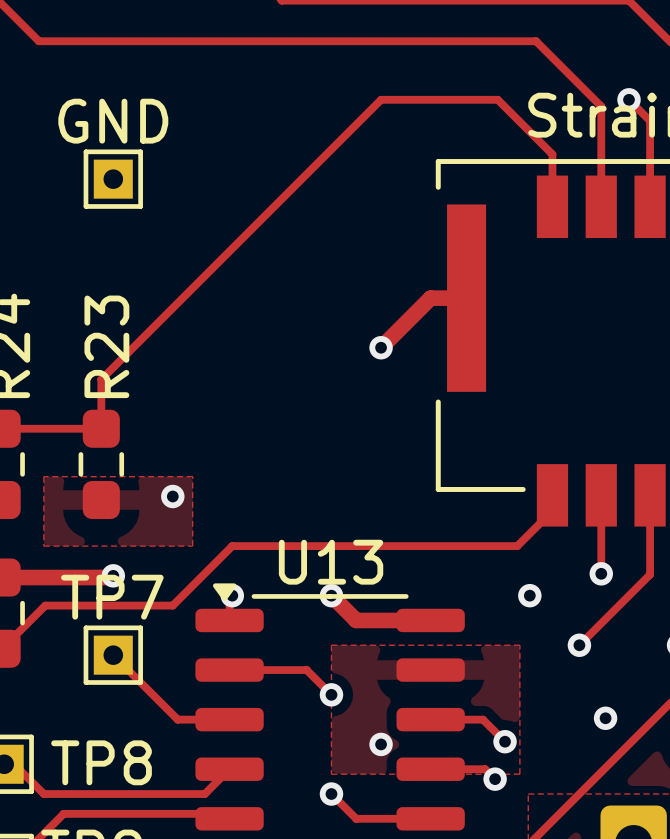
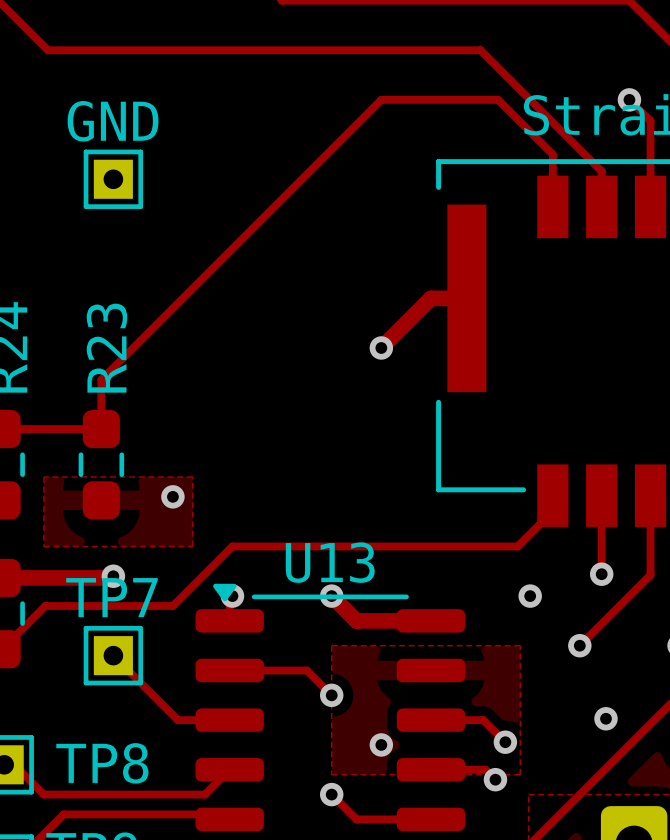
track: (38, 41) (536, 41) (601, 106) (601, 171) -> (38, 41) (47, 50) (480, 50) (601, 171)

